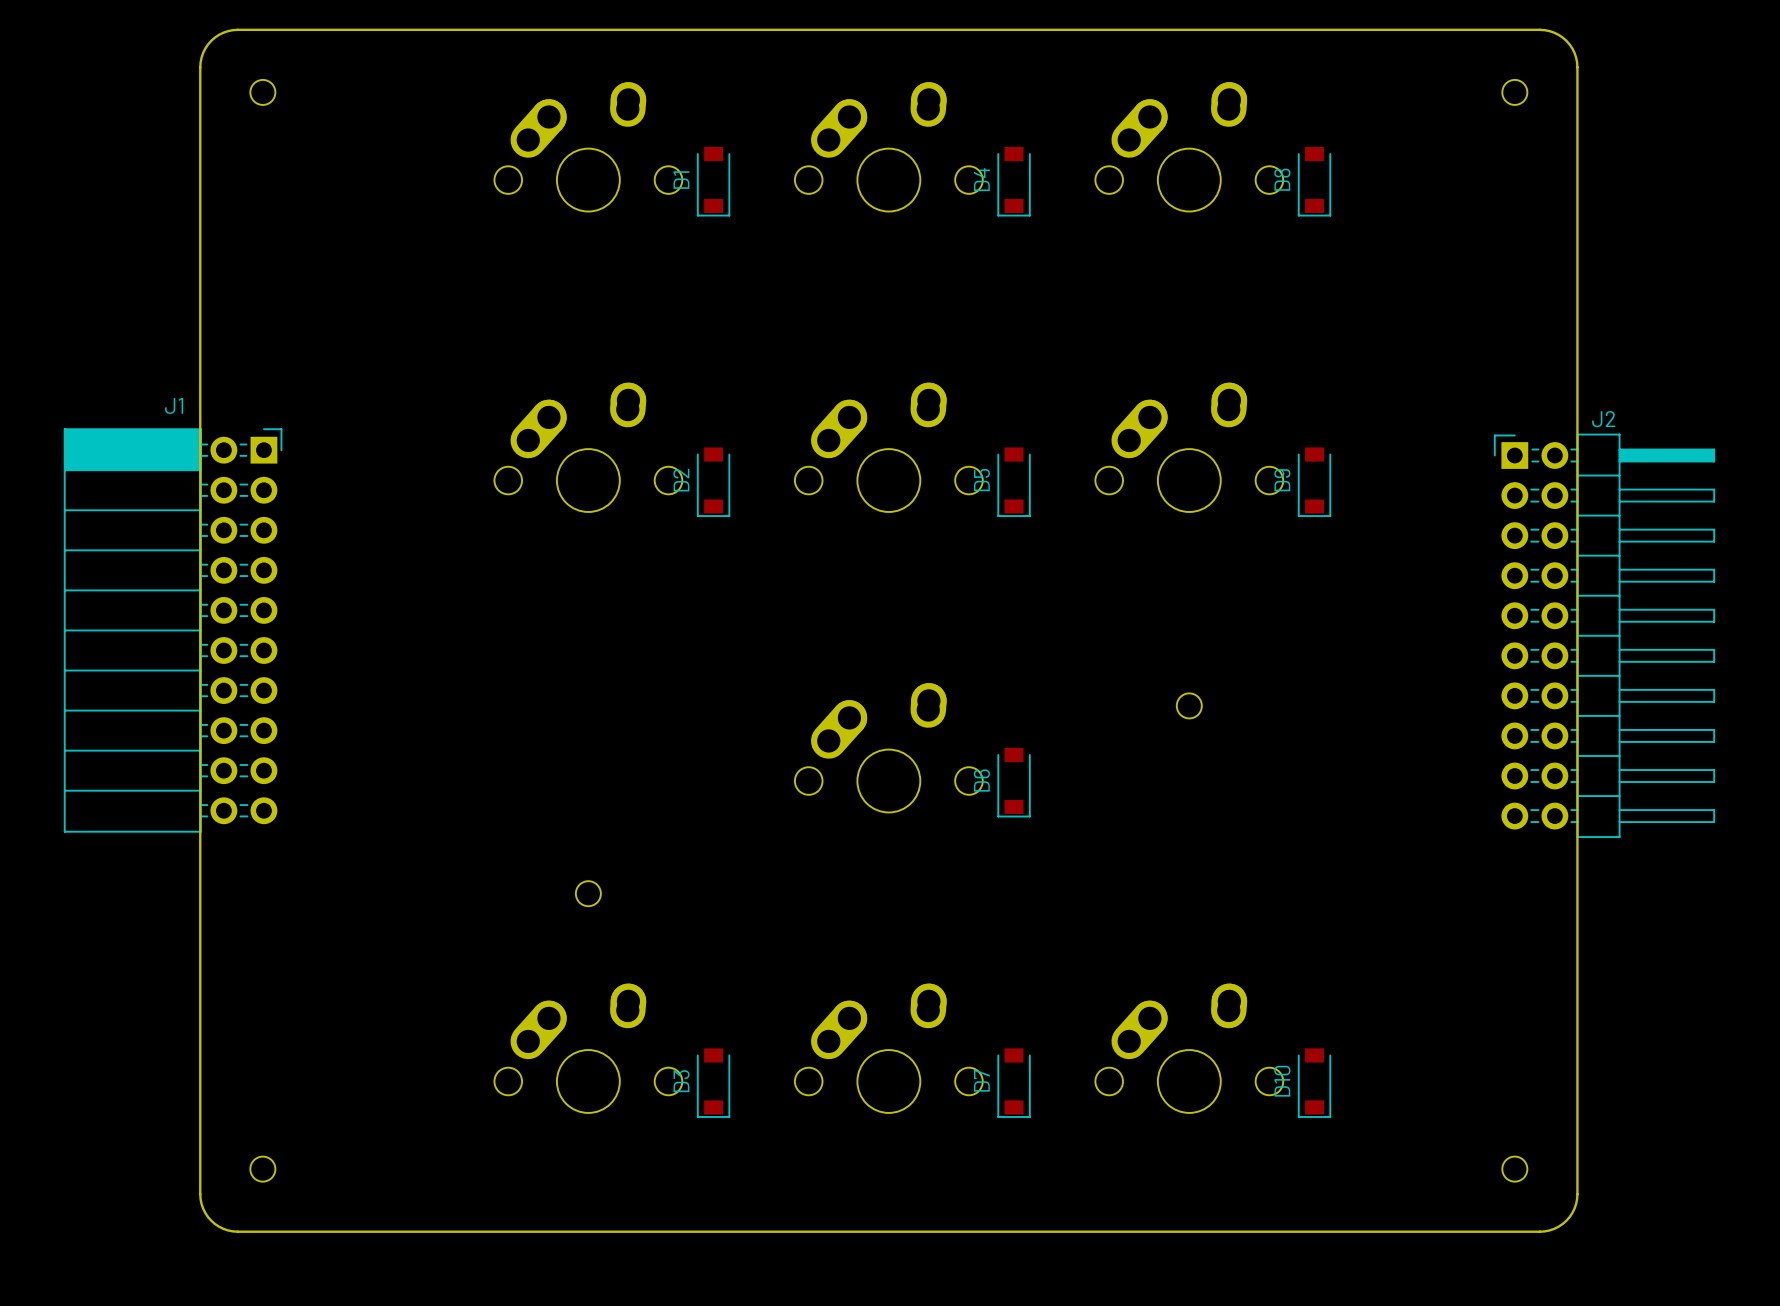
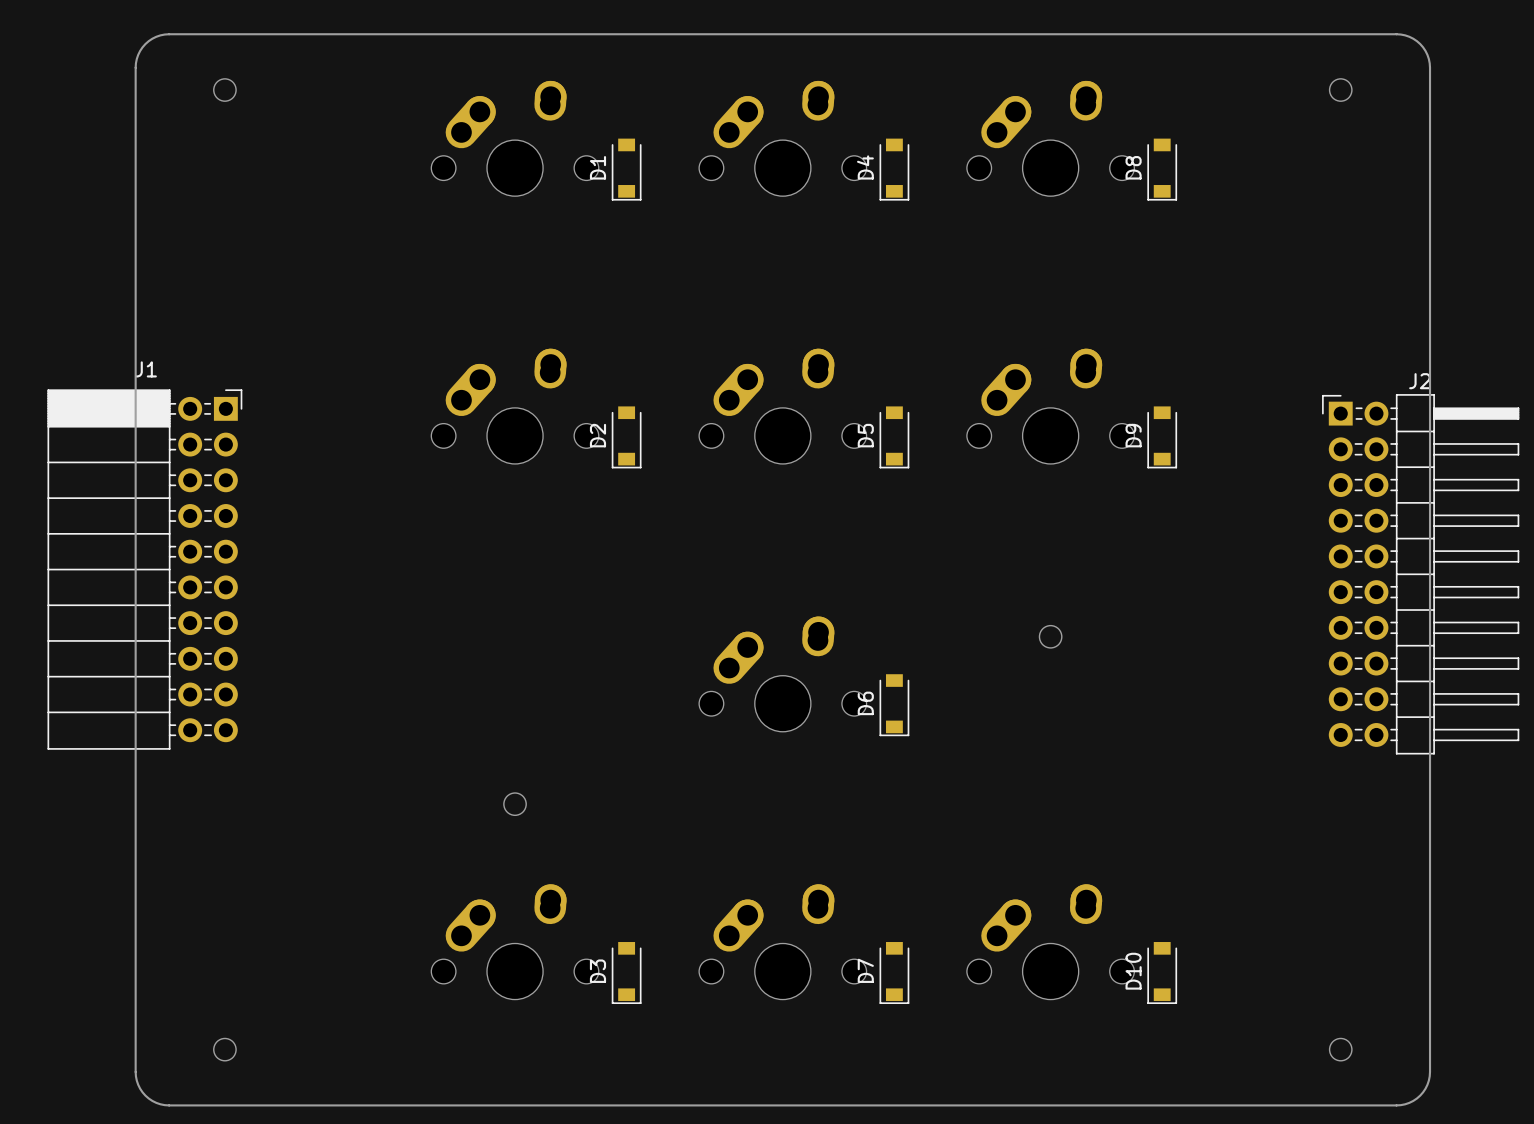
board edge: (237, 29) (223, 32) (211, 40) (203, 53) (200, 67) (200, 1194) (203, 1208) (211, 1220) (223, 1228) (237, 1231) -> (202, 34) (164, 34) (152, 38) (140, 50) (135, 67) (135, 1071) (140, 1088) (152, 1100) (164, 1105) (202, 1105)
board edge: (1539, 29) (1554, 32) (1566, 40) (1574, 53) (1577, 67) (1577, 1194) (1574, 1208) (1566, 1220) (1554, 1228) (1539, 1231) -> (1363, 34) (1400, 34) (1413, 38) (1425, 50) (1430, 67) (1430, 1071) (1425, 1088) (1413, 1100) (1400, 1105) (1363, 1105)

